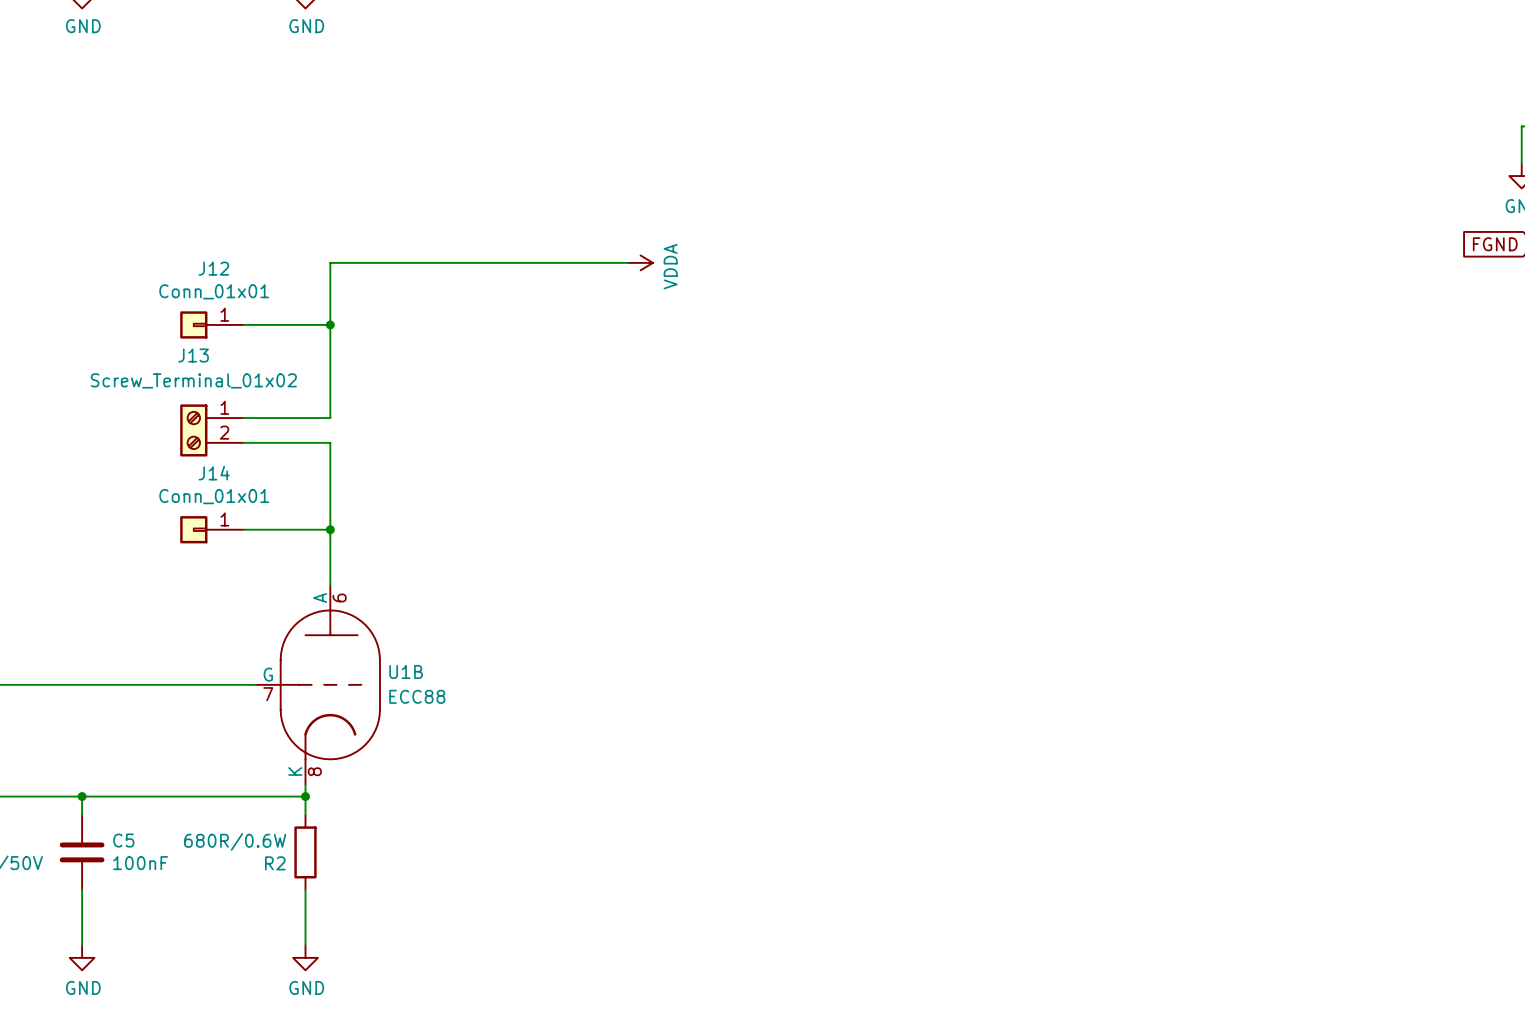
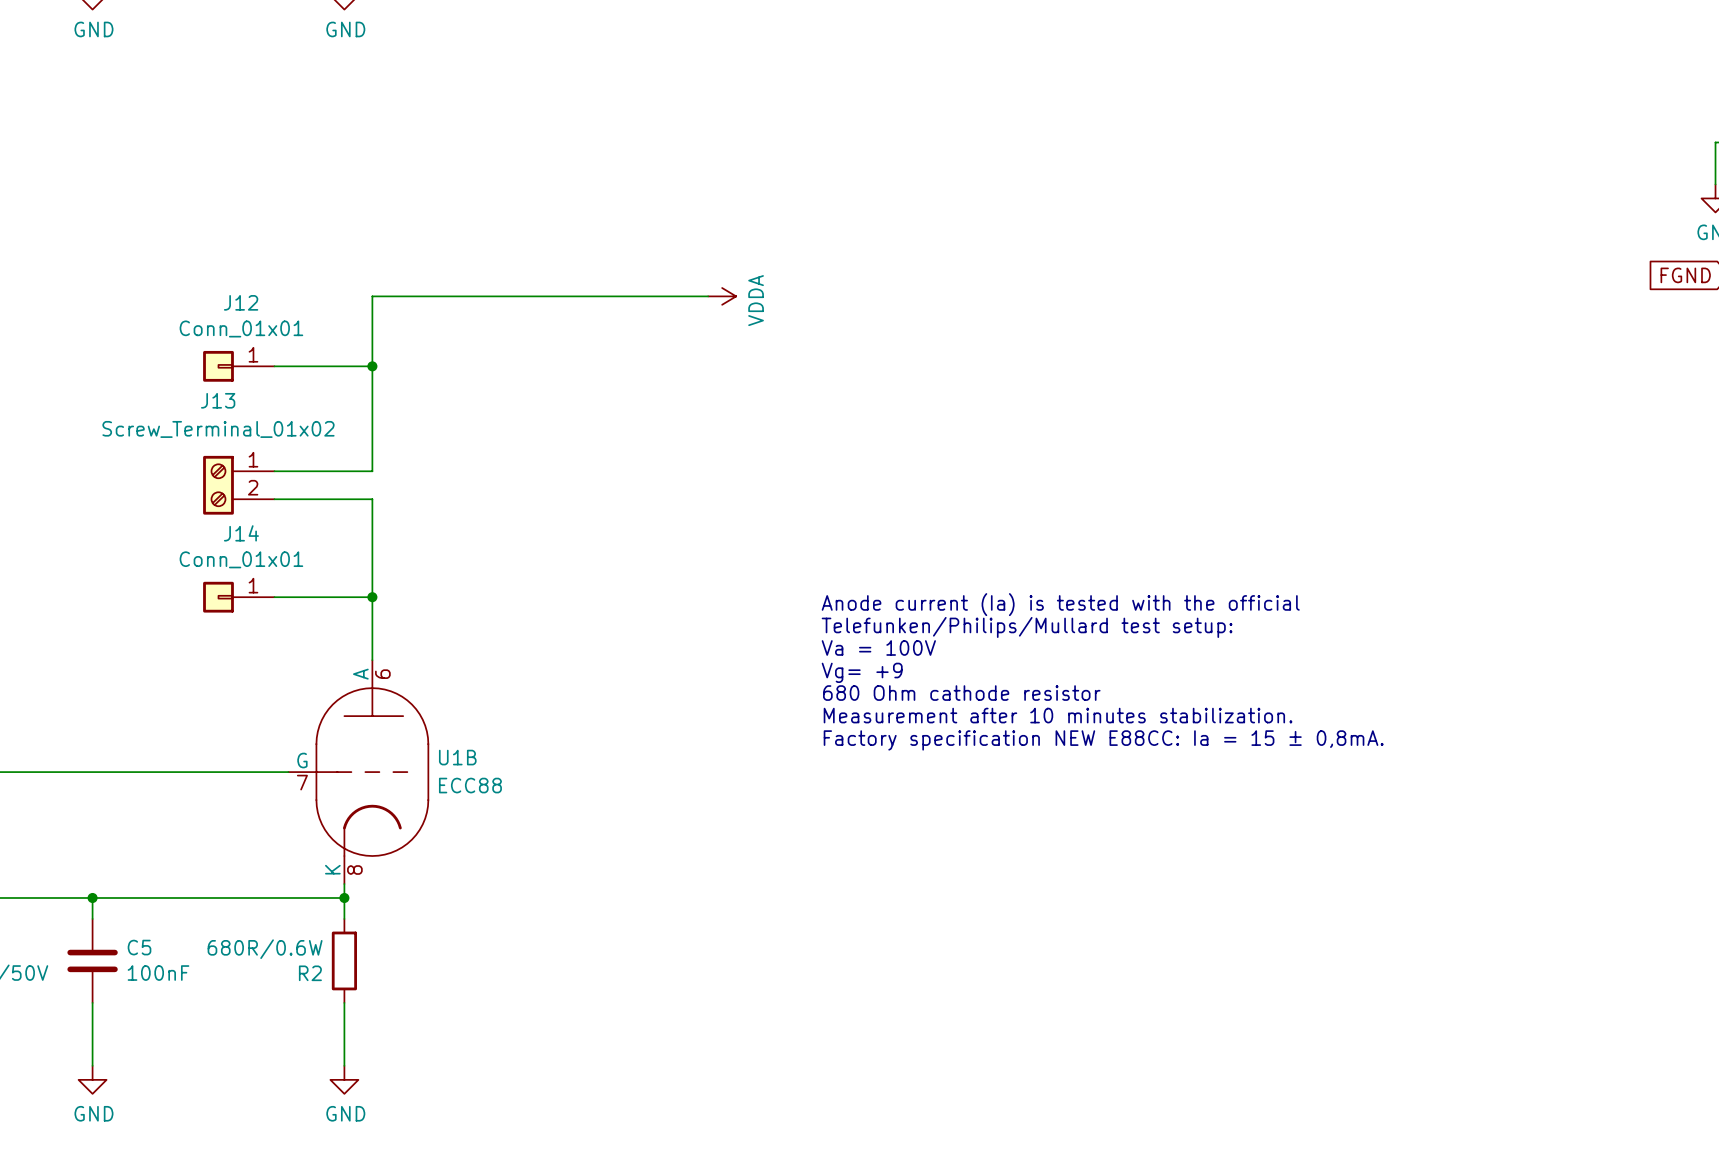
text: none -> Anode current (Ia) is tested with the official (1060, 604)
text: none -> Telefunken/Philips/Mullard test setup: (1027, 627)
text: none -> Va = 100V (878, 647)
text: none -> Vg= +9 (862, 672)
text: none -> 680 Ohm cathode resistor (961, 693)
text: none -> Measurement after 10 minutes stabilization. (1058, 715)
text: none -> Factory specification NEW E88CC: Ia = 15 ± 0,8mA. (1103, 740)

